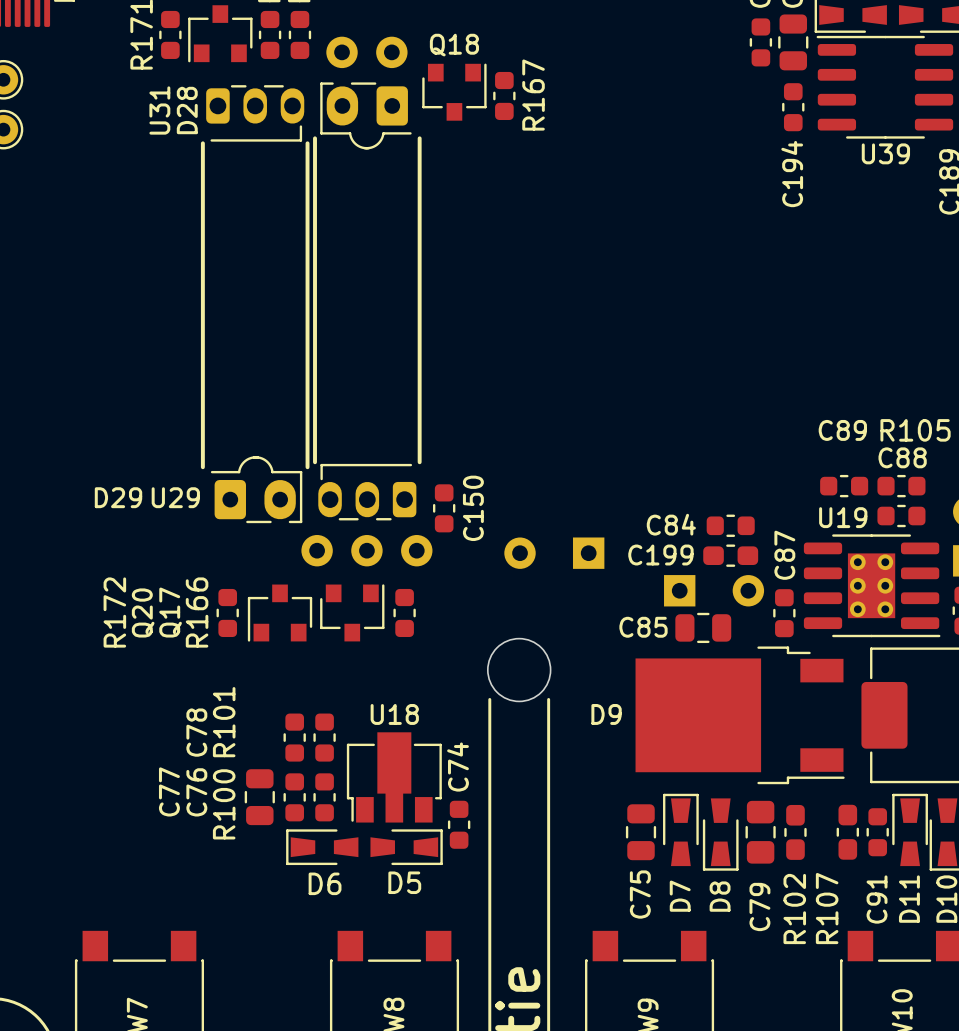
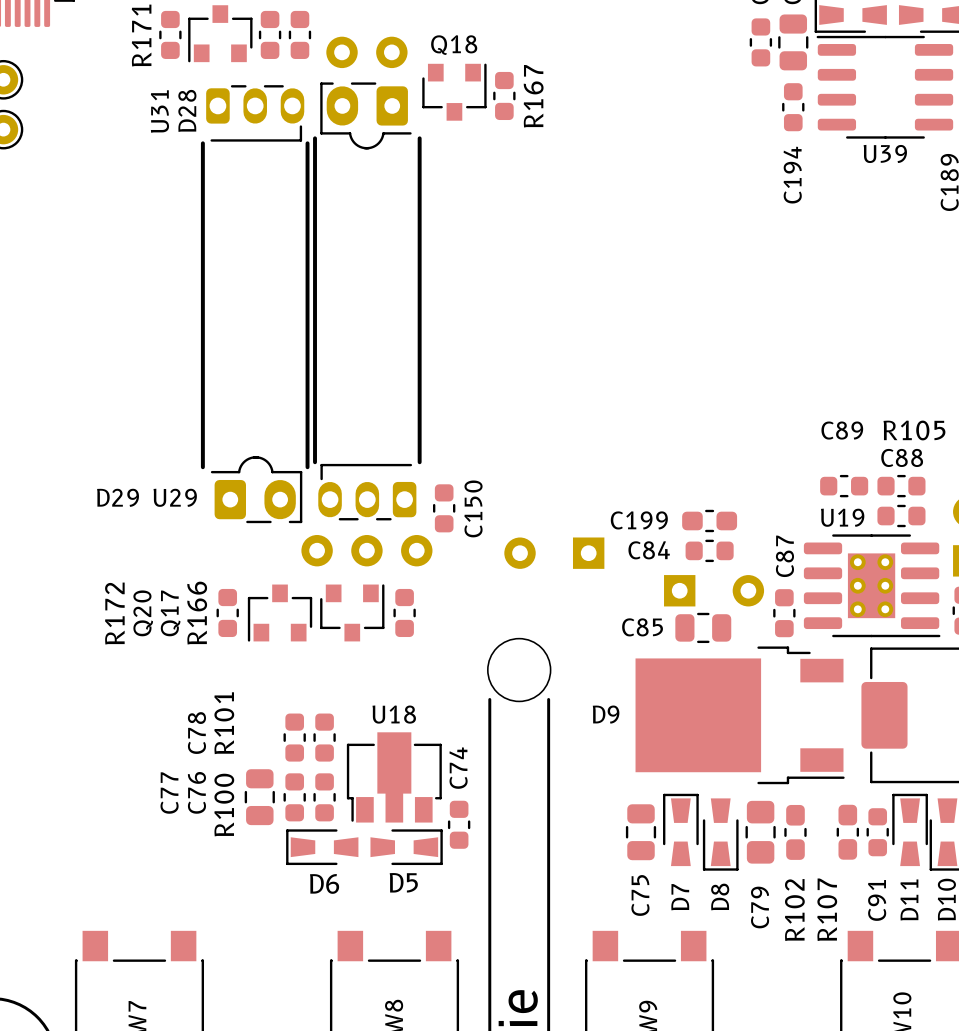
C84 position: (730, 525) -> (709, 550)
C199 position: (730, 555) -> (709, 520)

